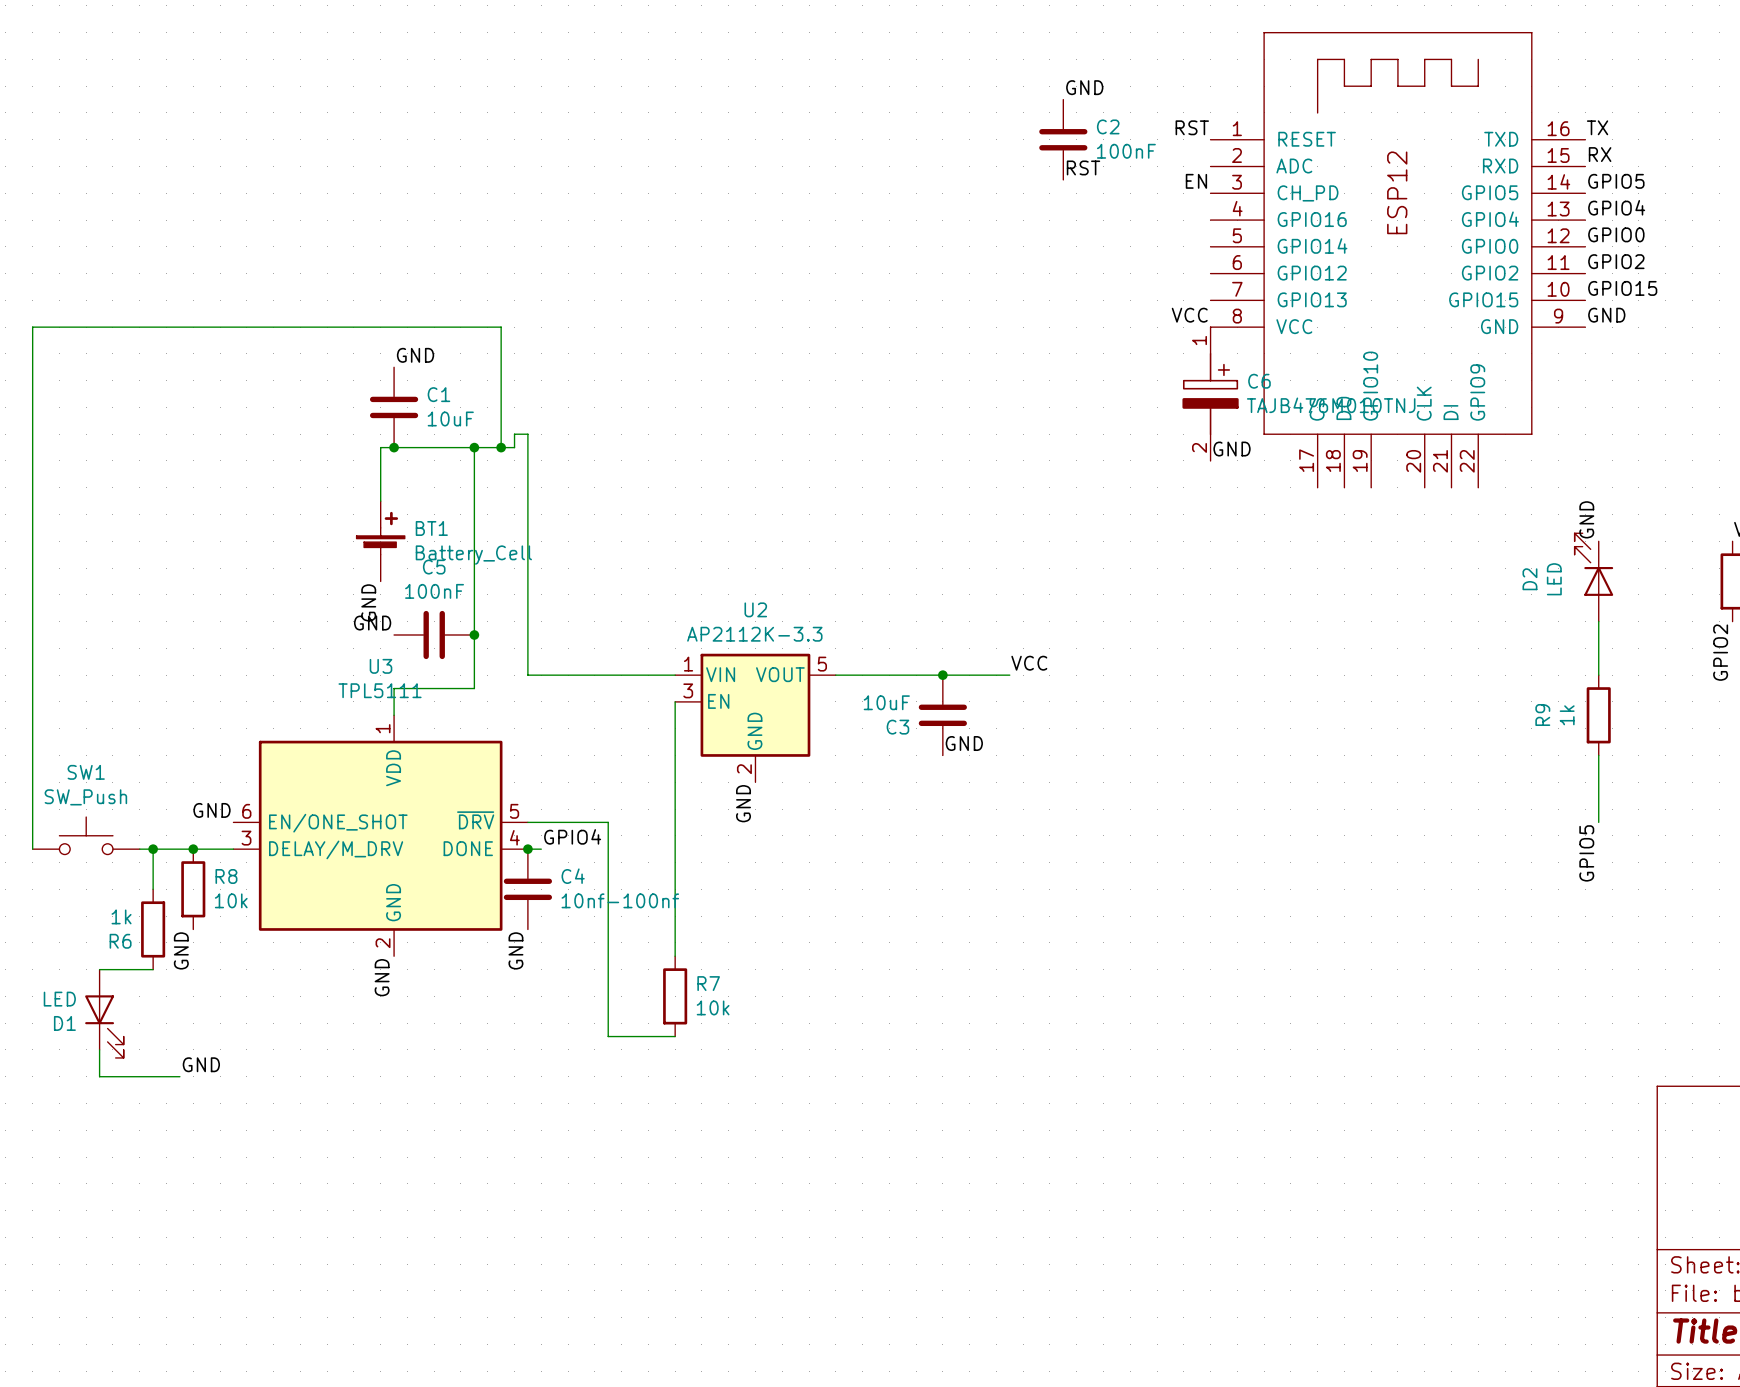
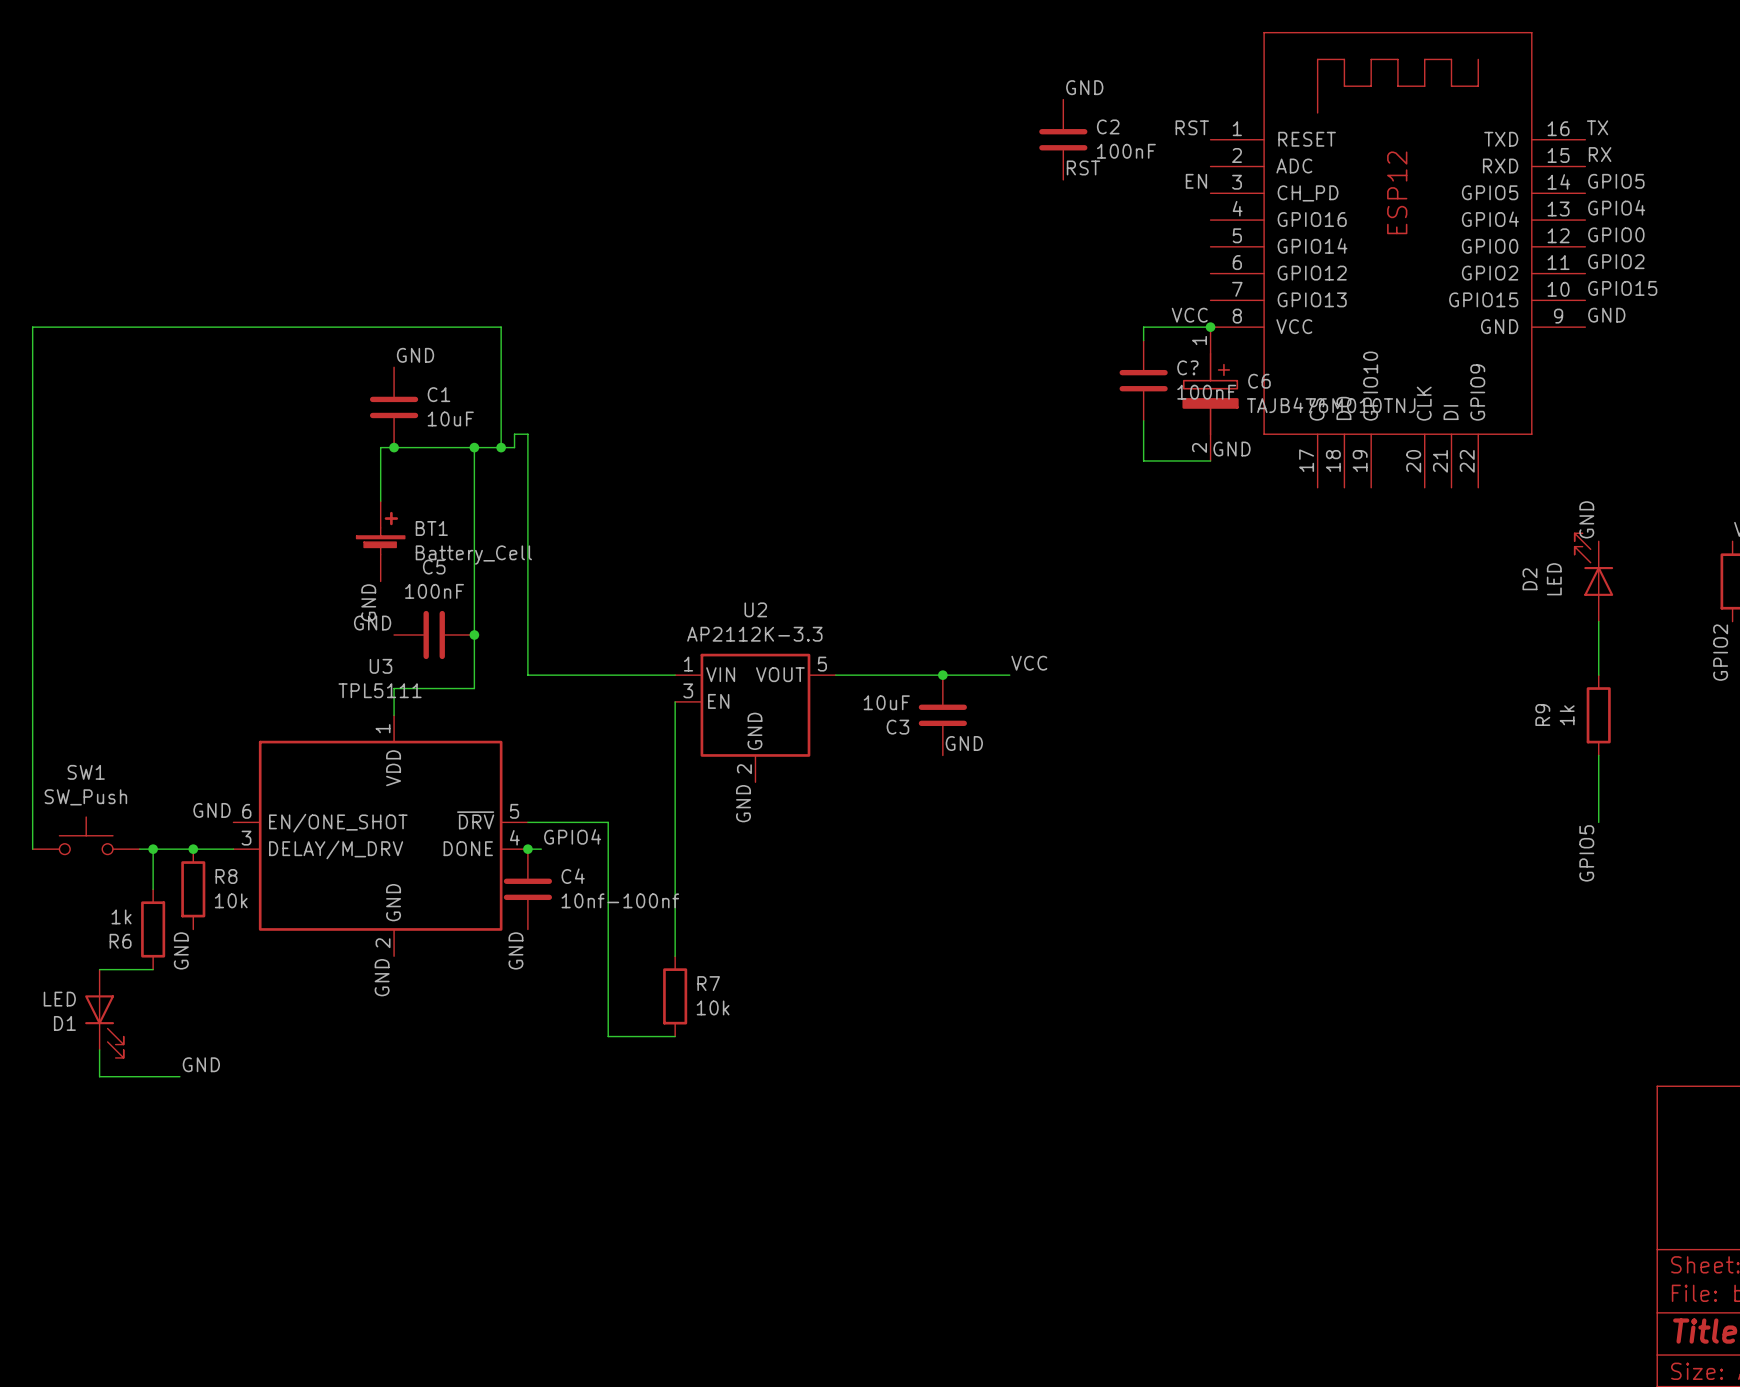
wire: none -> (1210, 327) (1143, 327) (1143, 340)
junction: none -> (1210, 327)
C?: none -> 100nF (1143, 380)
wire: none -> (1143, 420) (1143, 460) (1210, 460)

